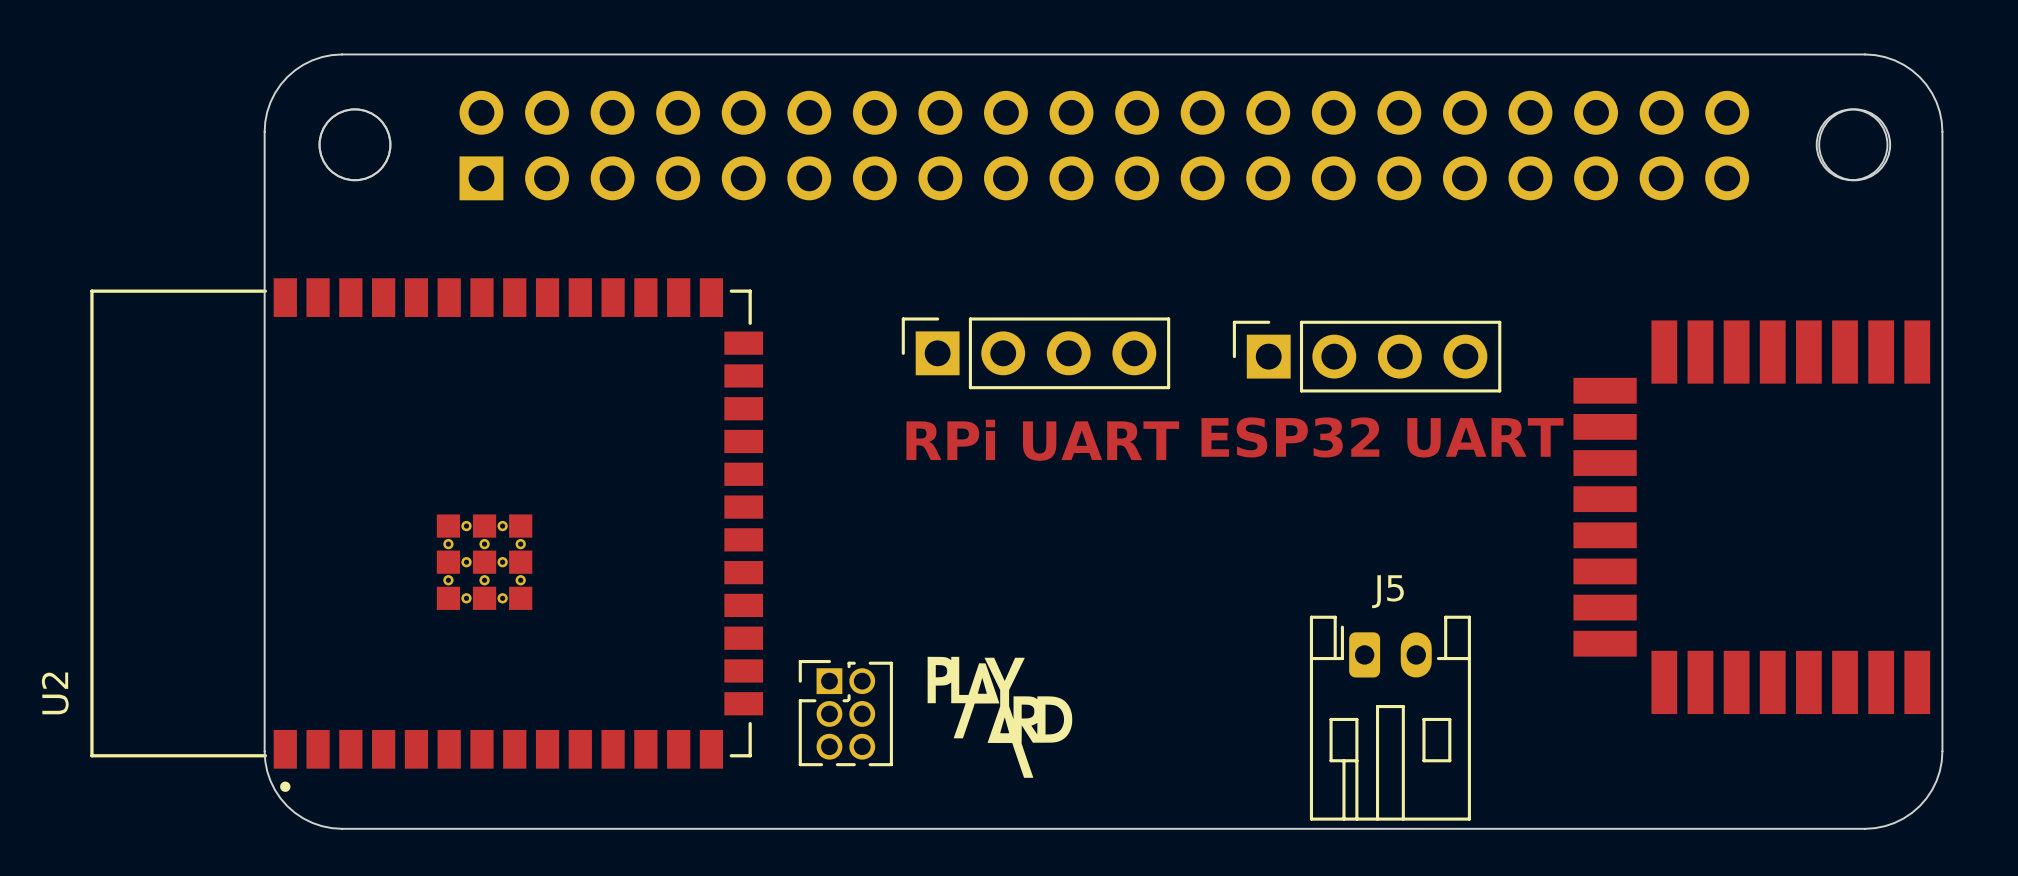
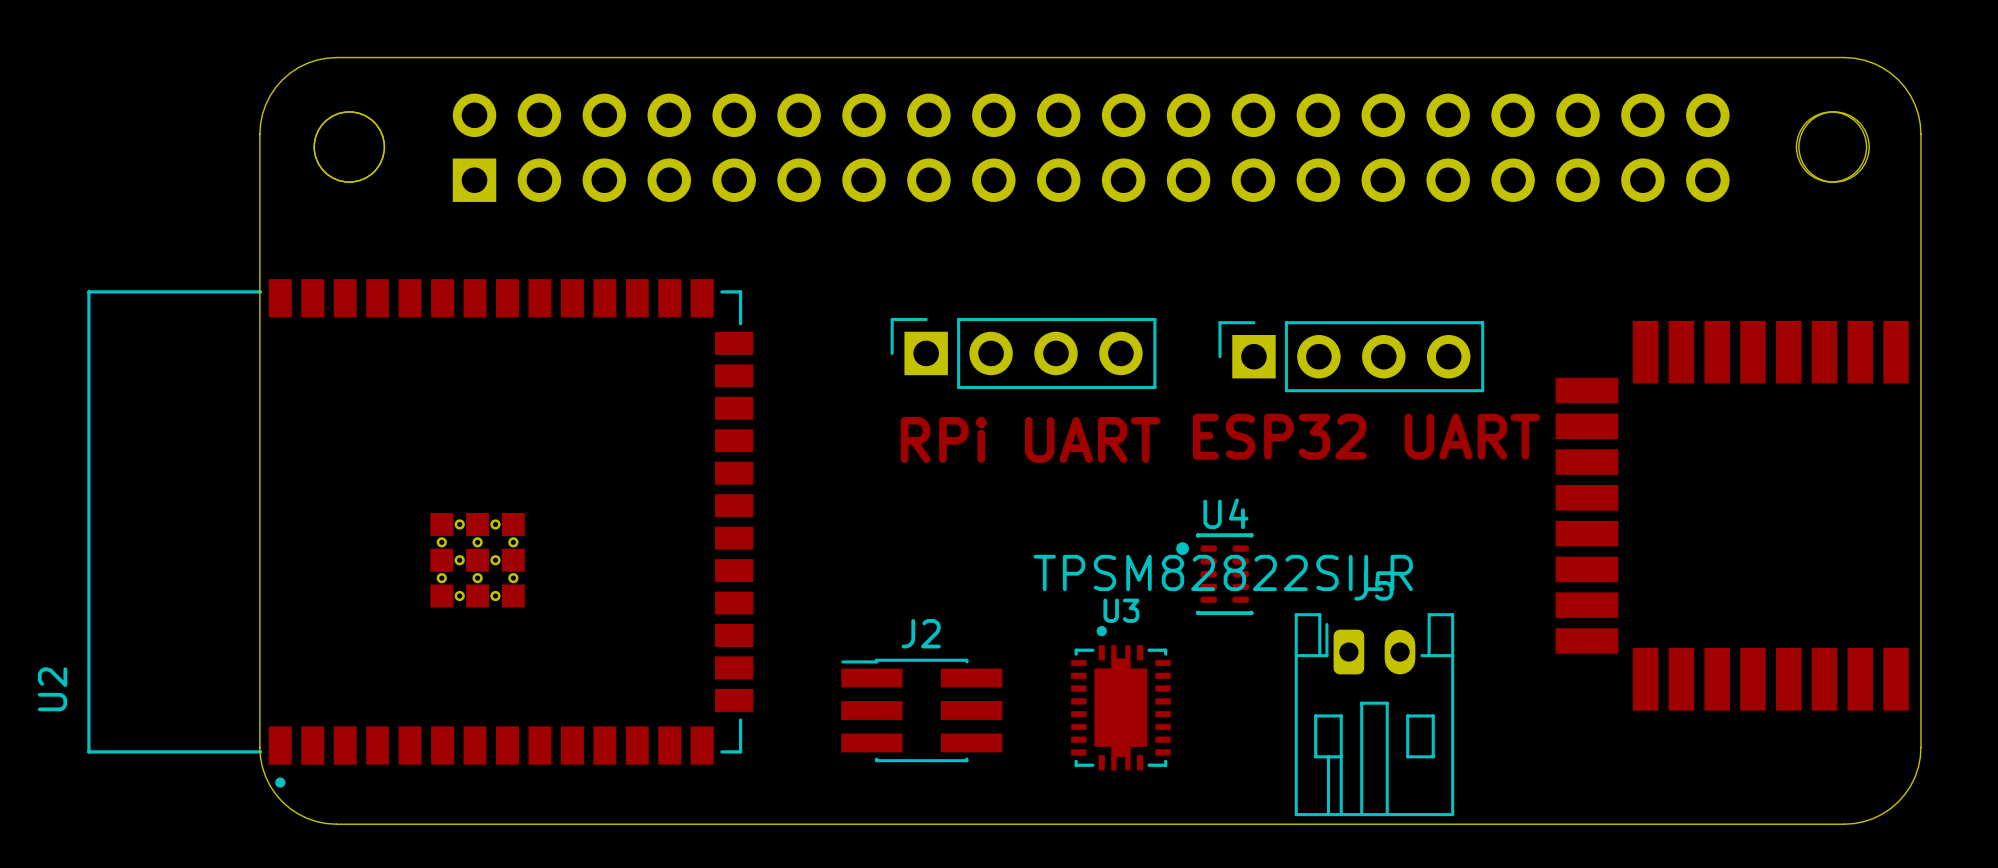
U4: none -> TPSM82822SILR (1214, 574)
drawing: [927, 656, 1073, 778] -> none
U3: none -> (1120, 698)
part: (845, 713) -> none
J2: none -> (921, 710)

